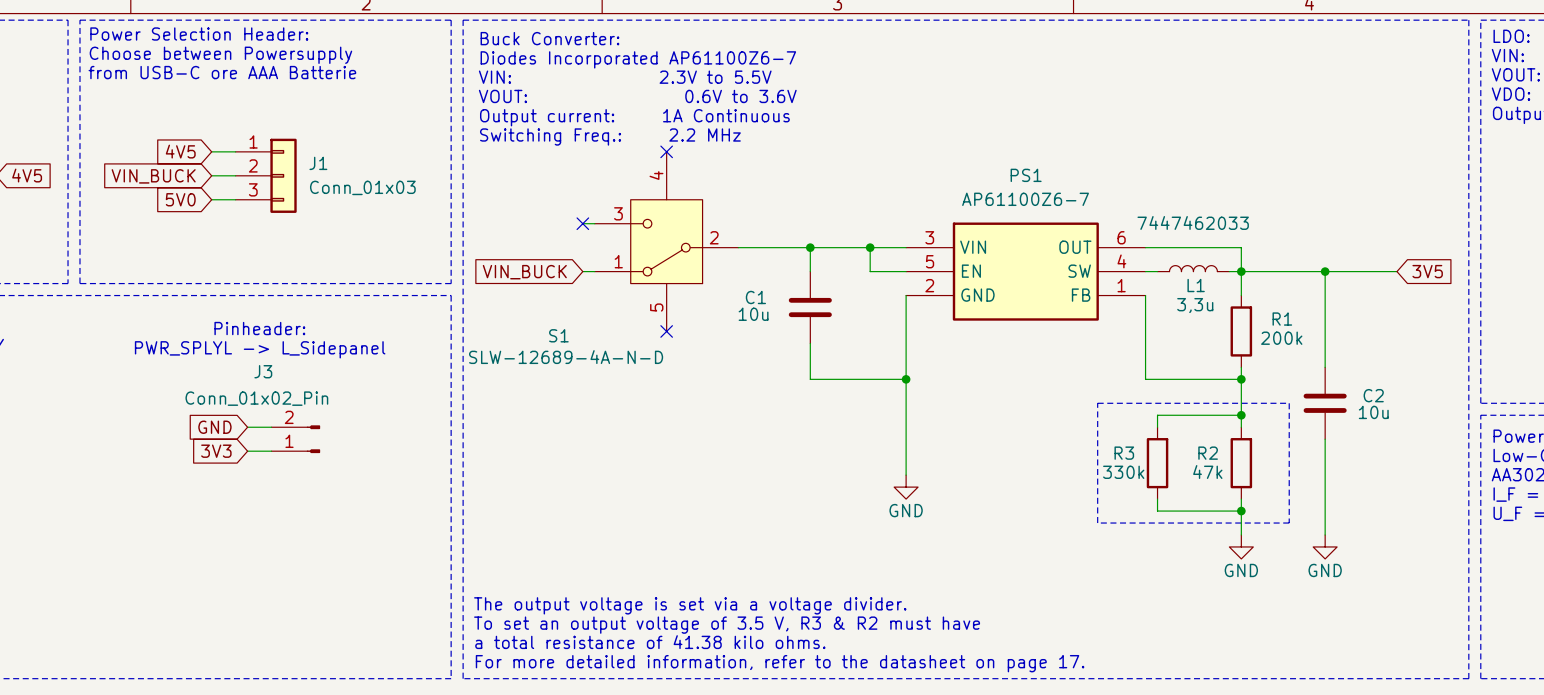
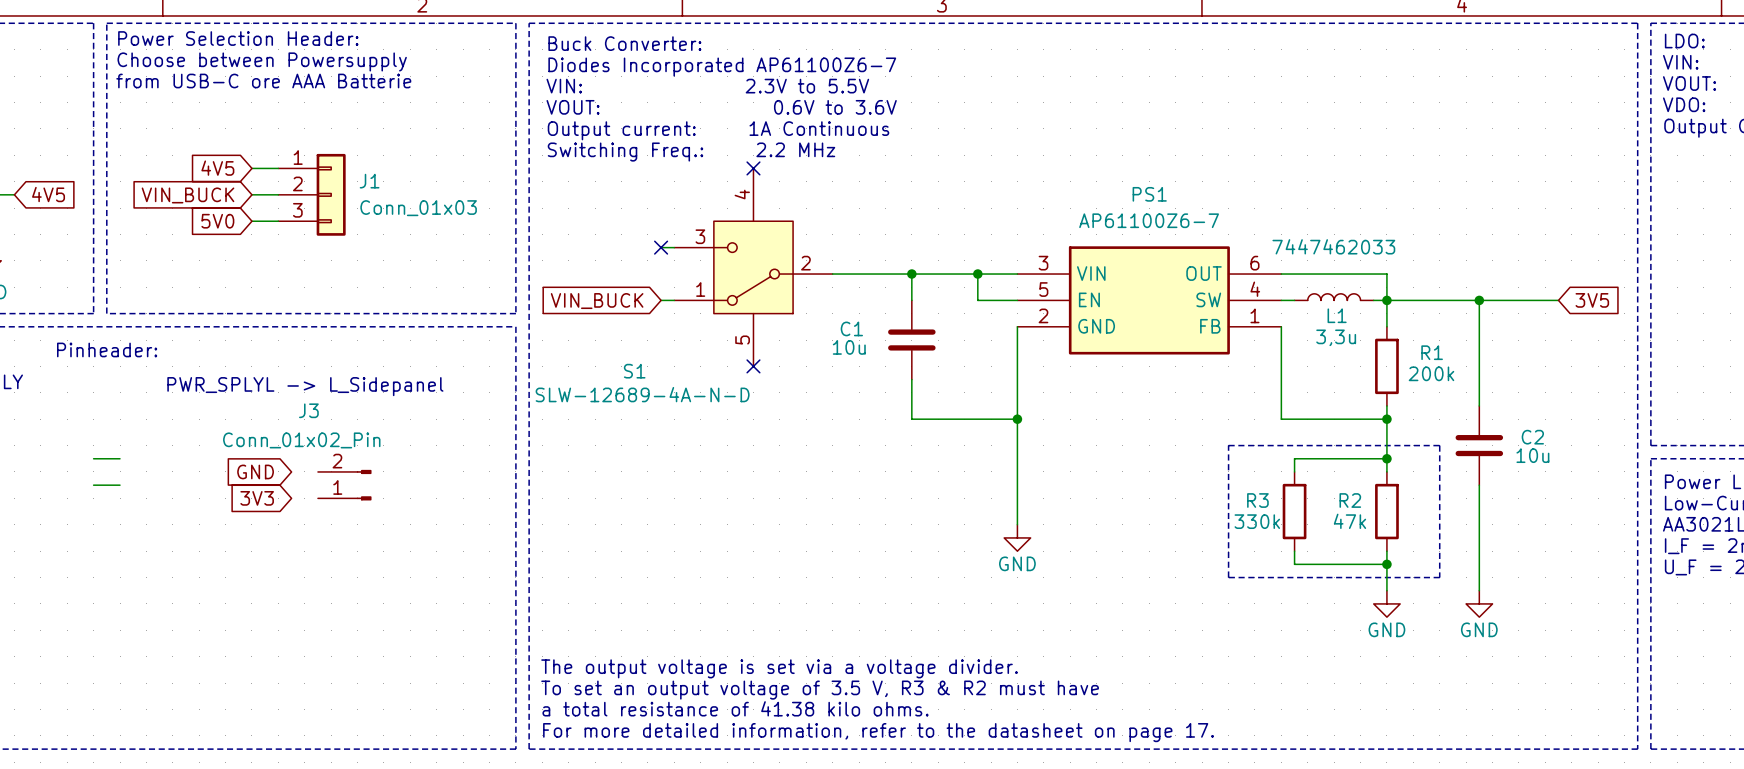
text: none -> Pinheader: (107, 349)
text: Pinheader: (259, 328) -> none
wire: (247, 427) (271, 427) -> (93, 458) (120, 458)
wire: (247, 451) (271, 451) -> (93, 485) (120, 485)

